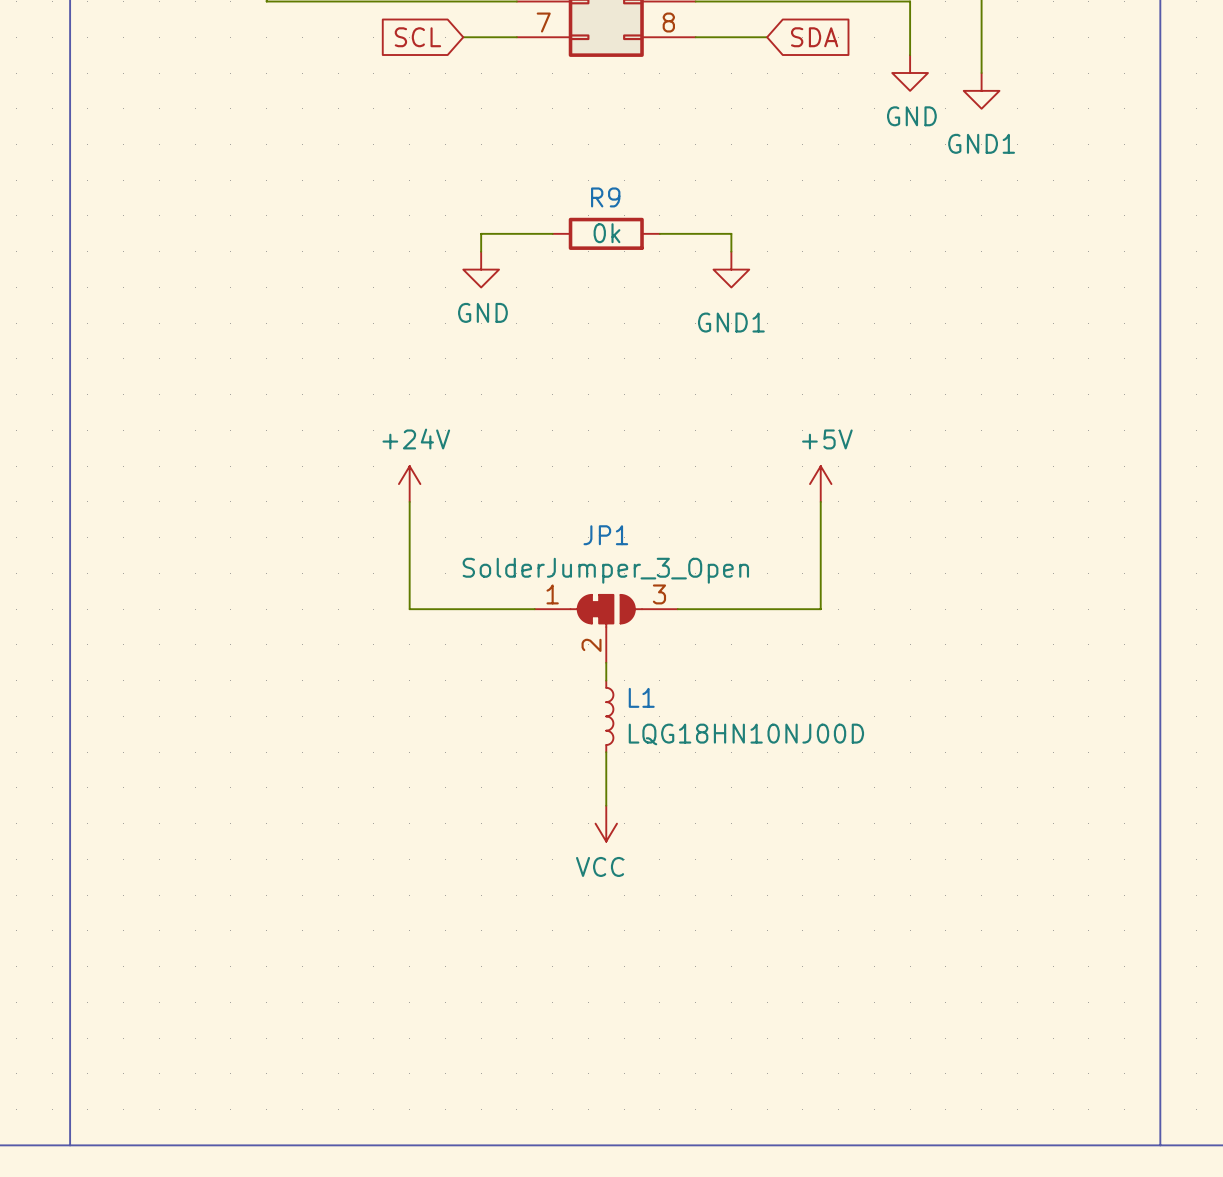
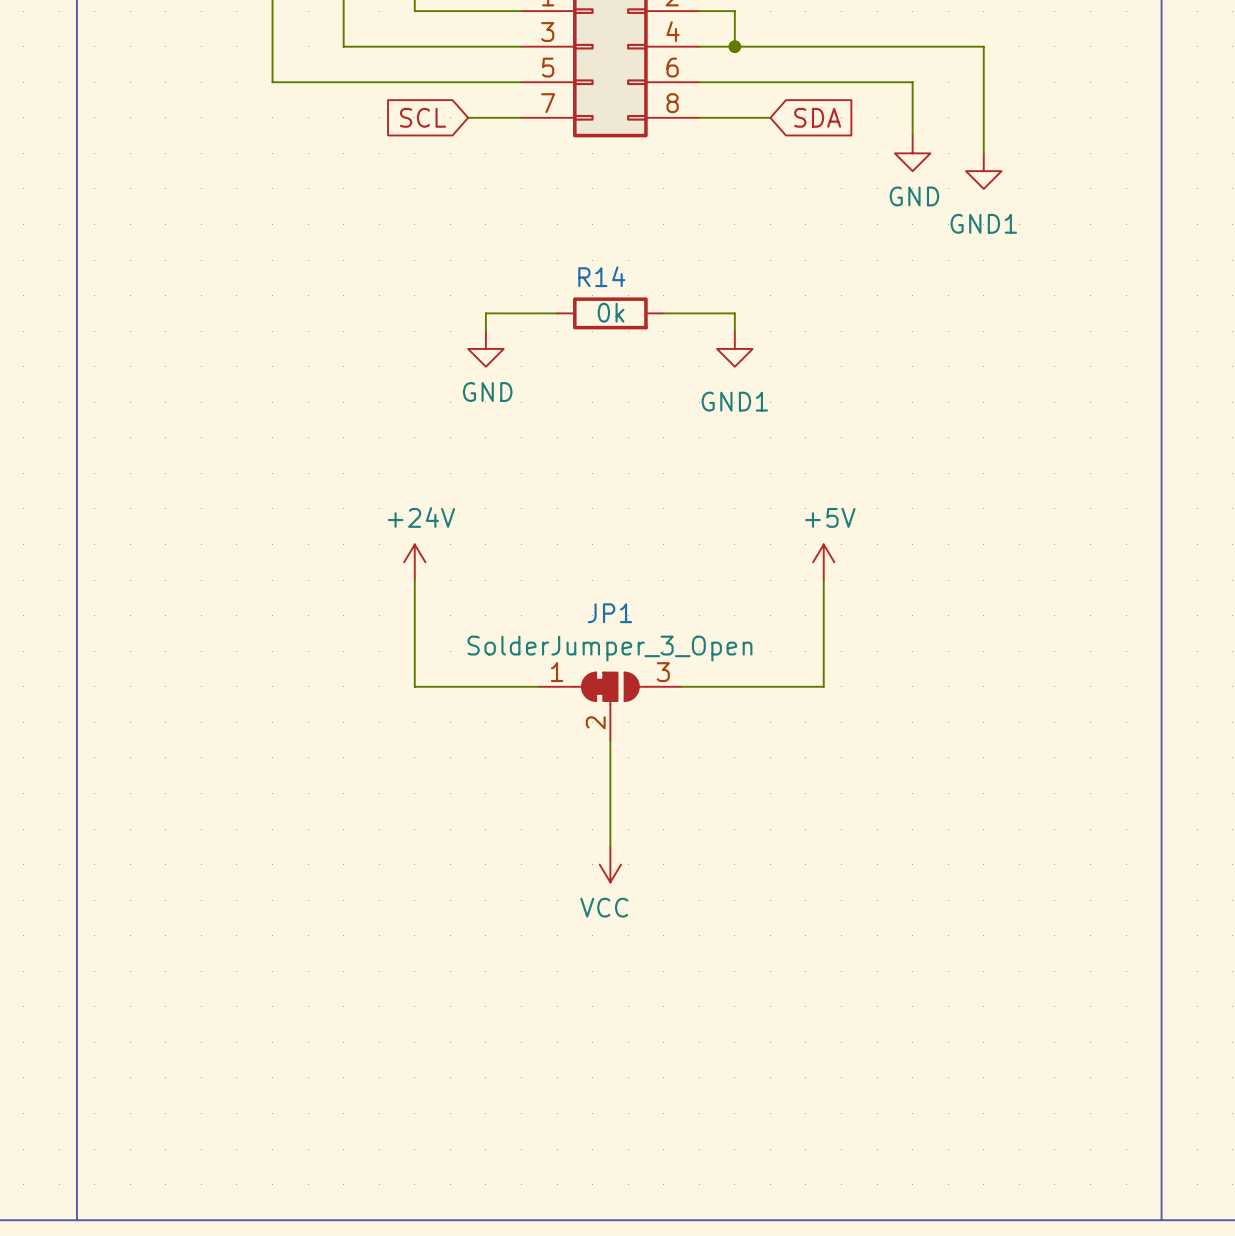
R9 name: R9 (605, 197) -> R14 (601, 276)
wire: none -> (610, 757) (610, 829)
L1: LQG18HN10NJ00D (609, 716) -> none
power symbol position: VCC (606, 823) -> VCC (610, 864)

